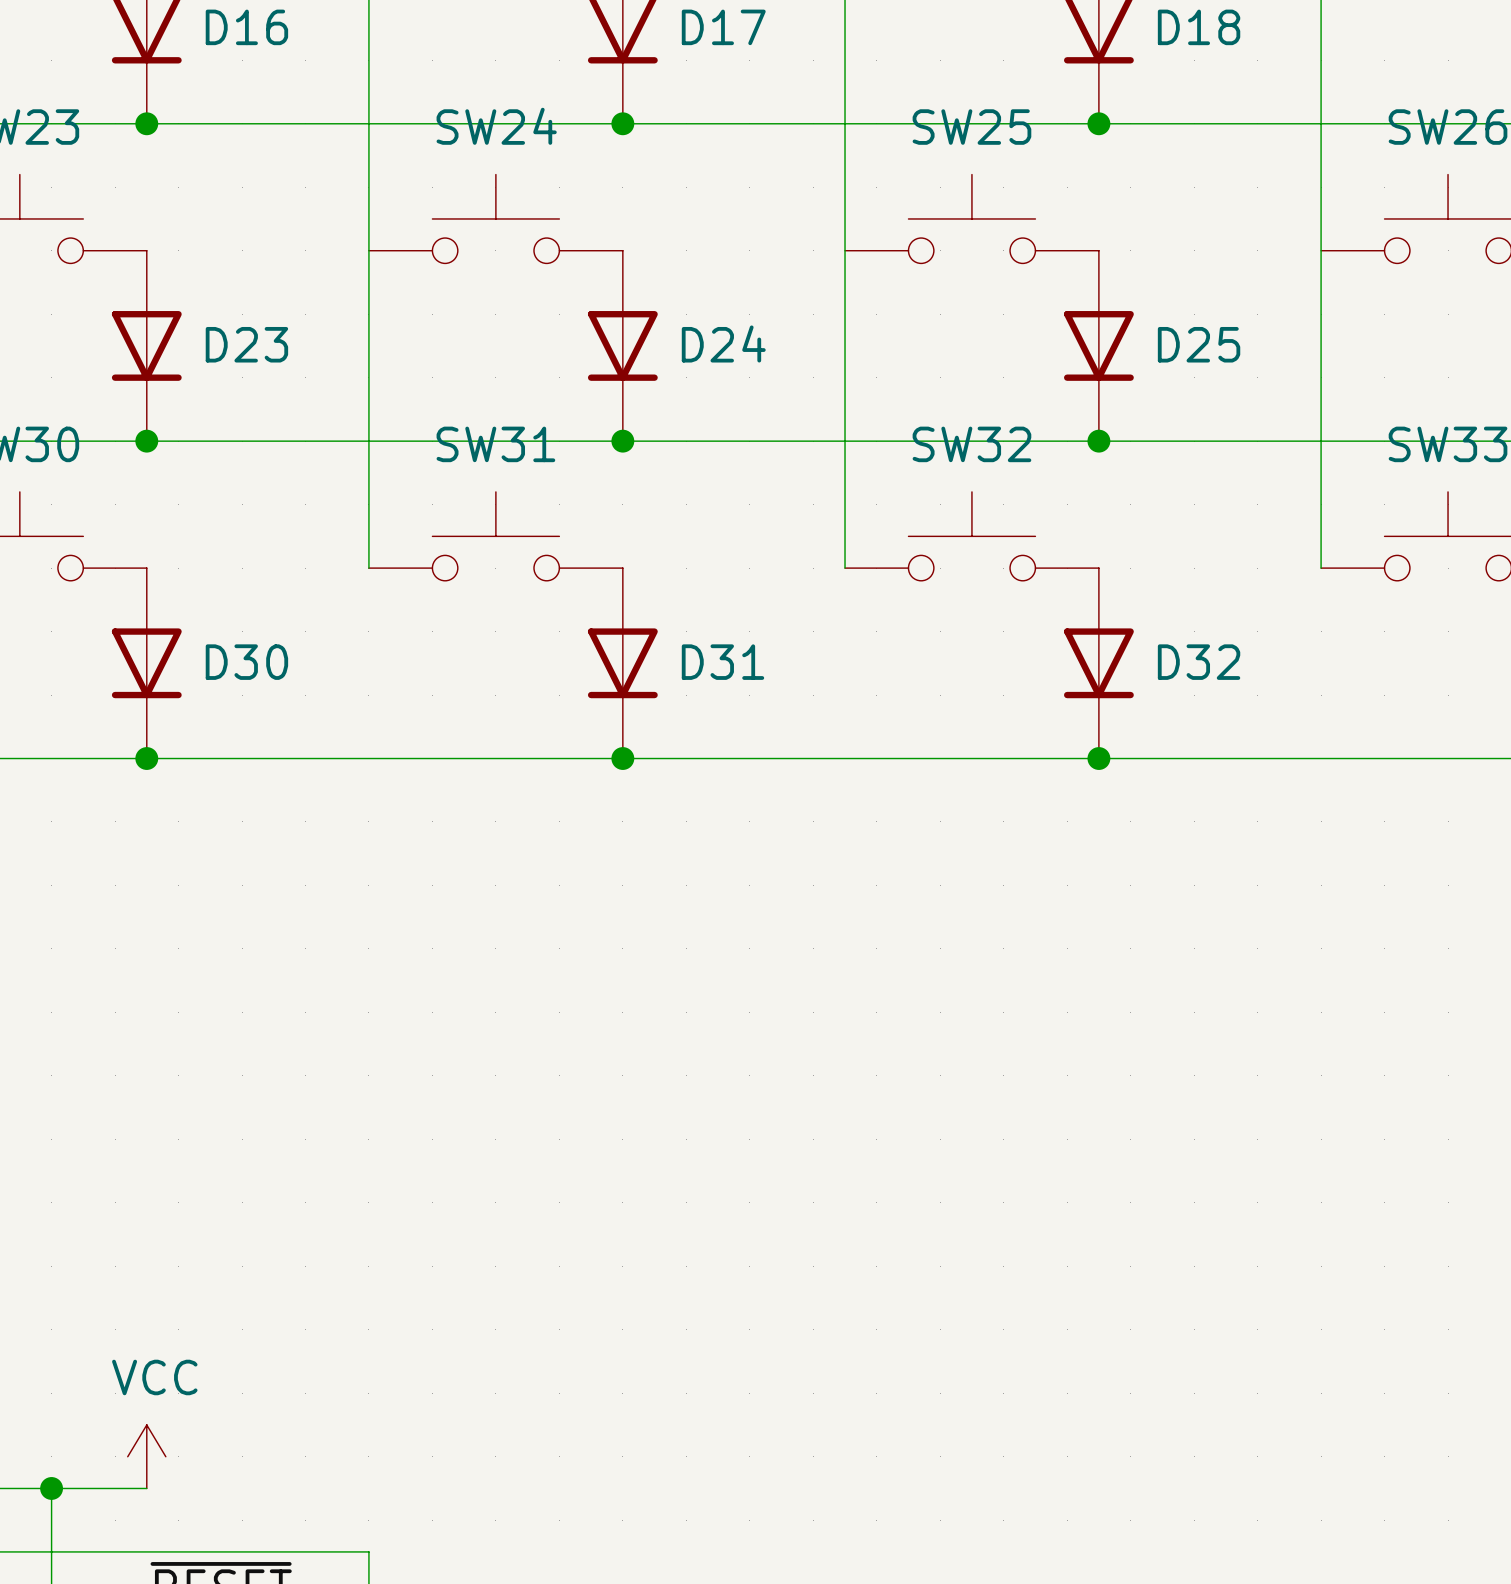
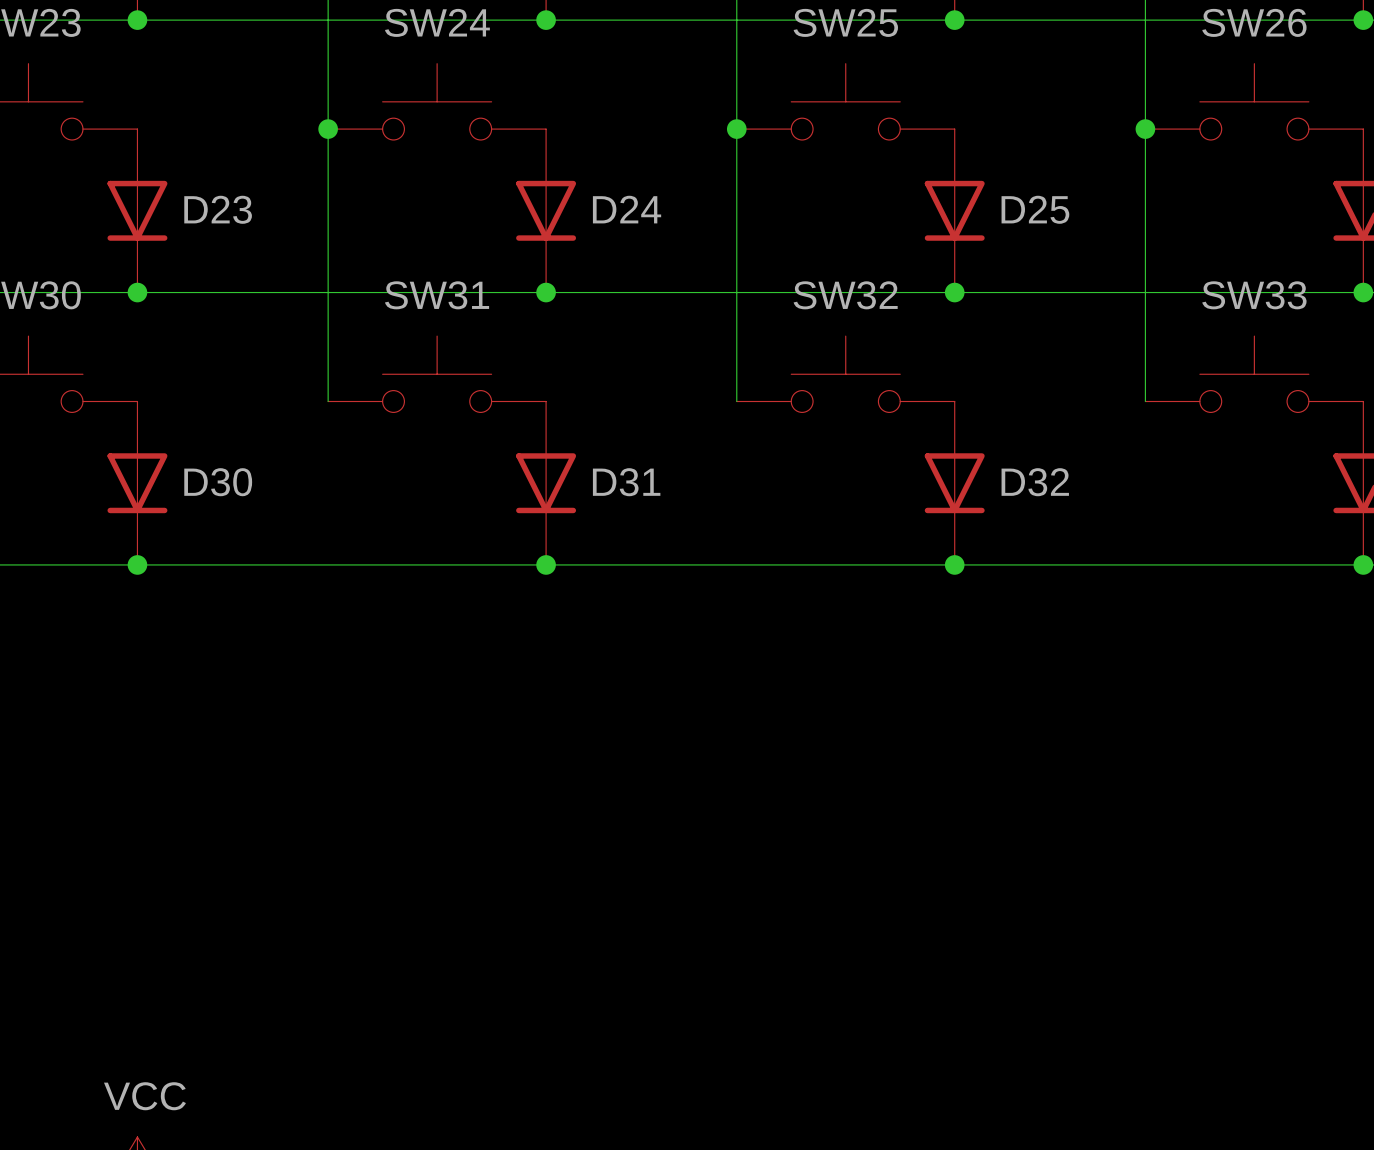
junction: none -> (328, 129)
junction: none -> (736, 129)
junction: none -> (1145, 129)

